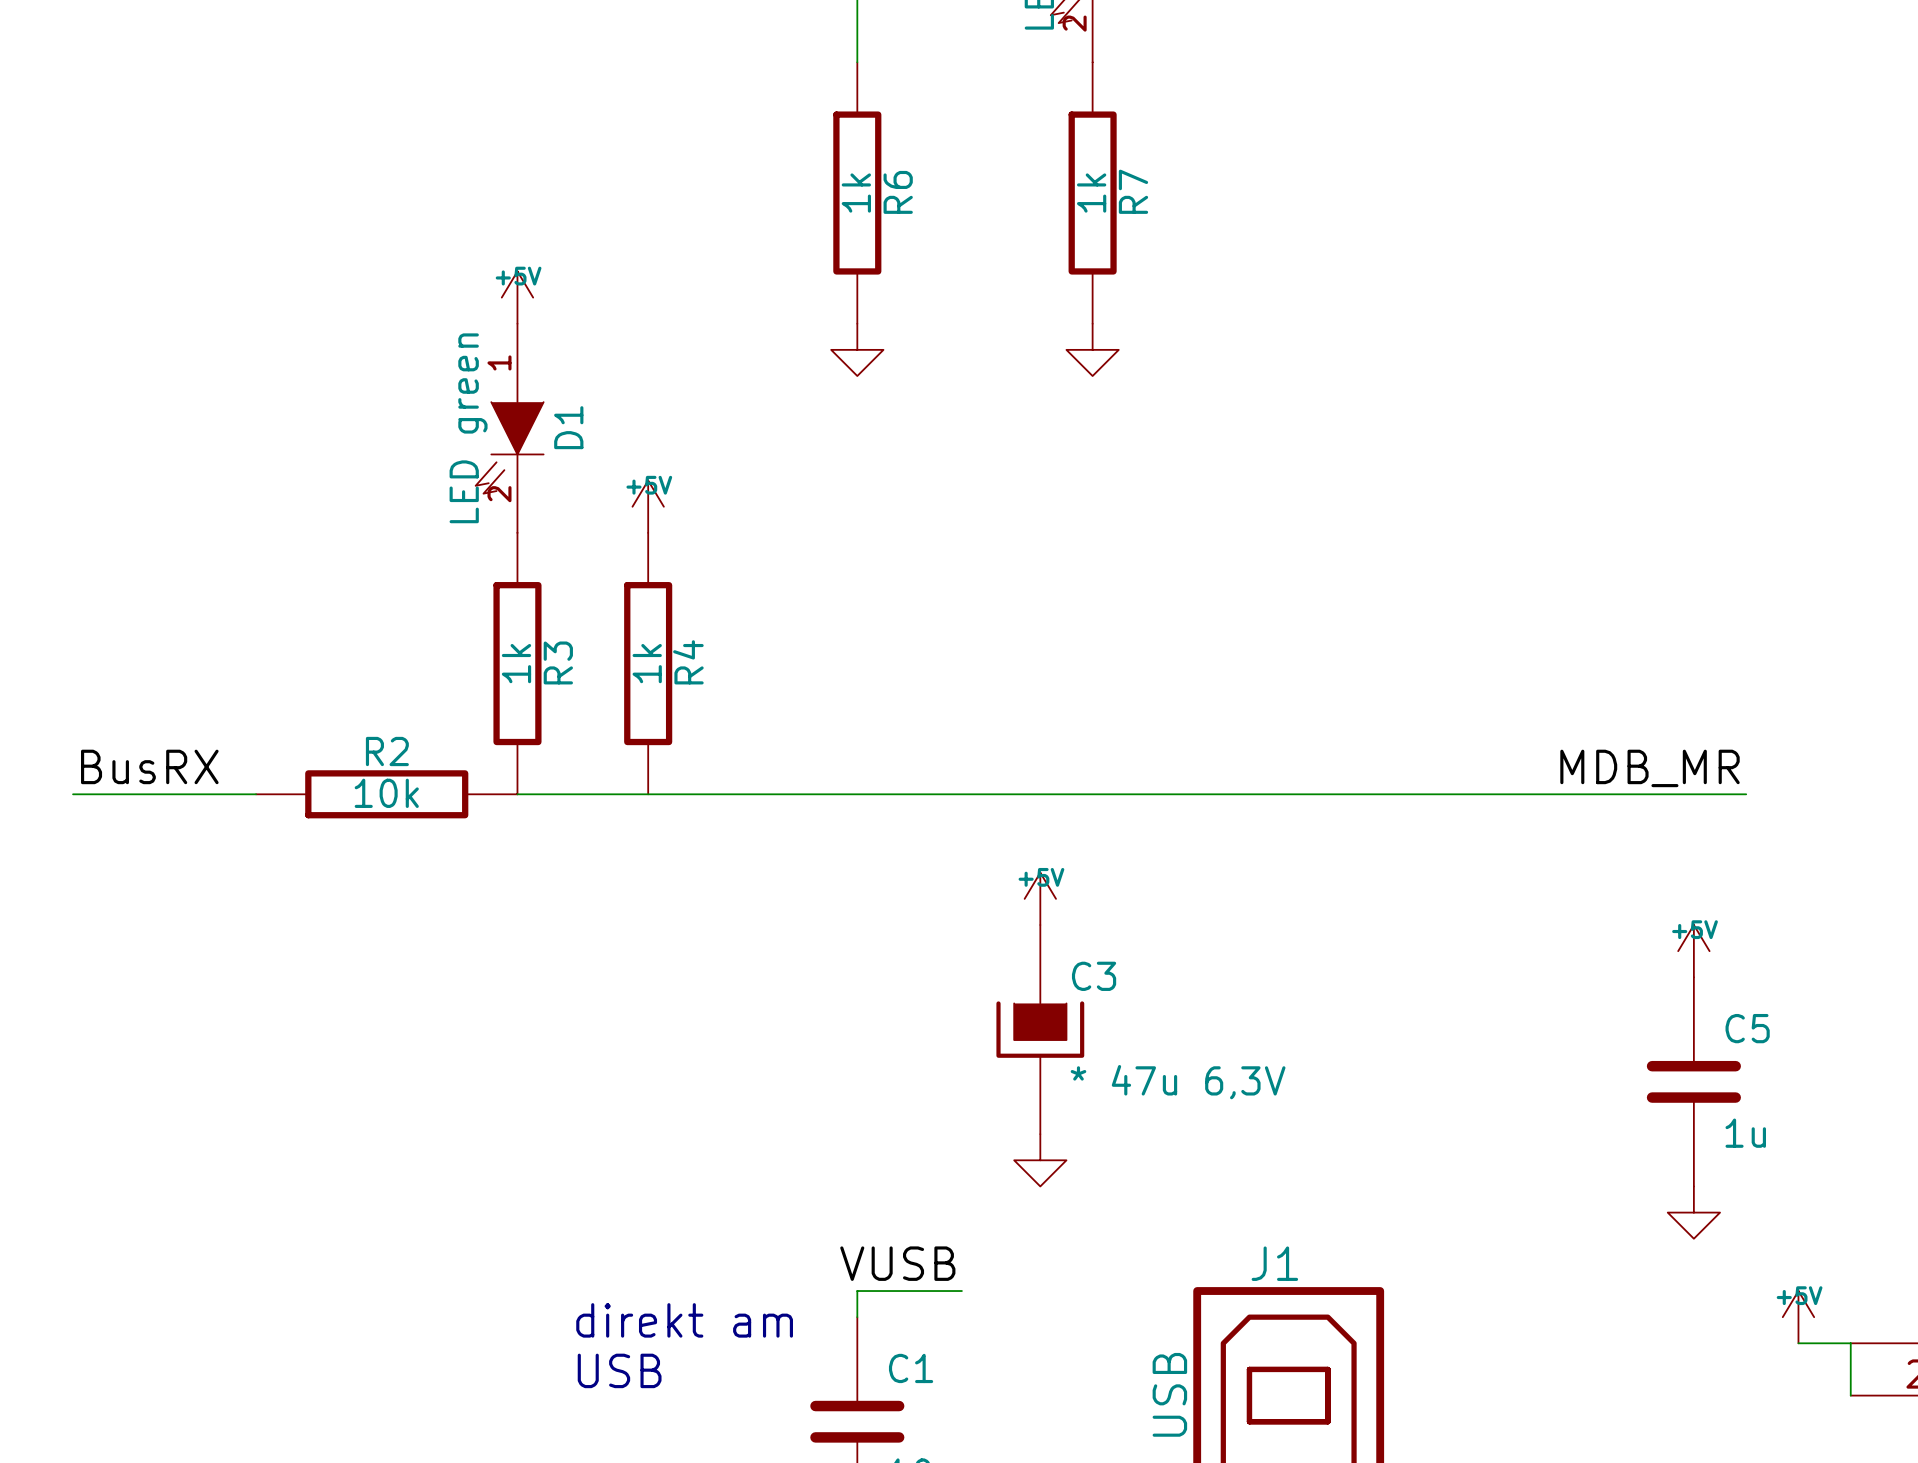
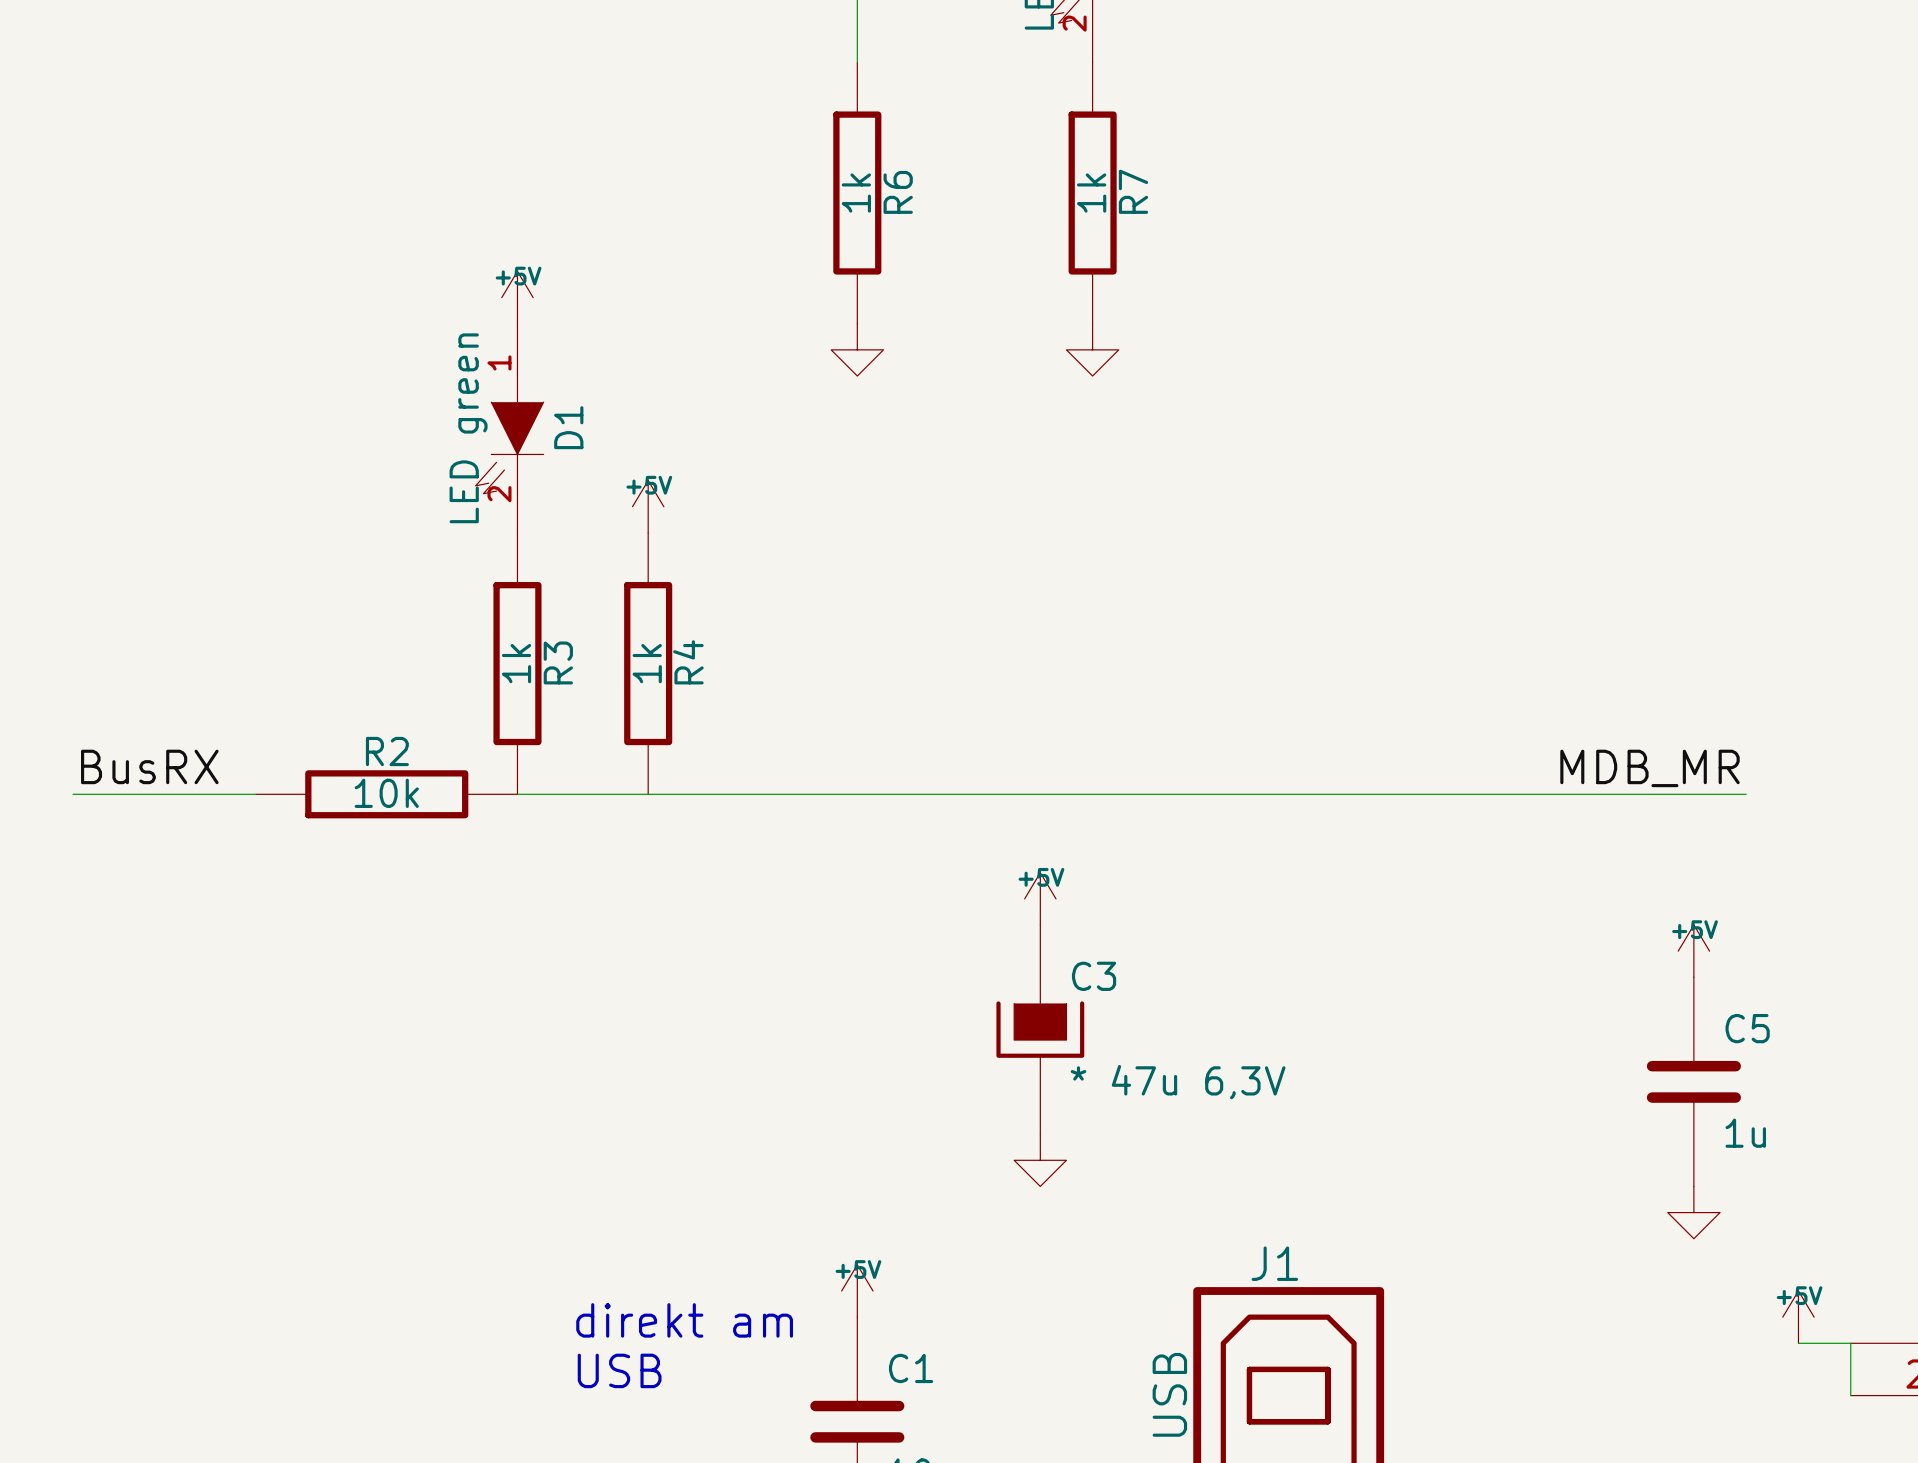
label: VUSB (897, 1263) -> none
power symbol: none -> +5V (857, 1291)
wire: (961, 1291) (857, 1291) (857, 1317) -> none

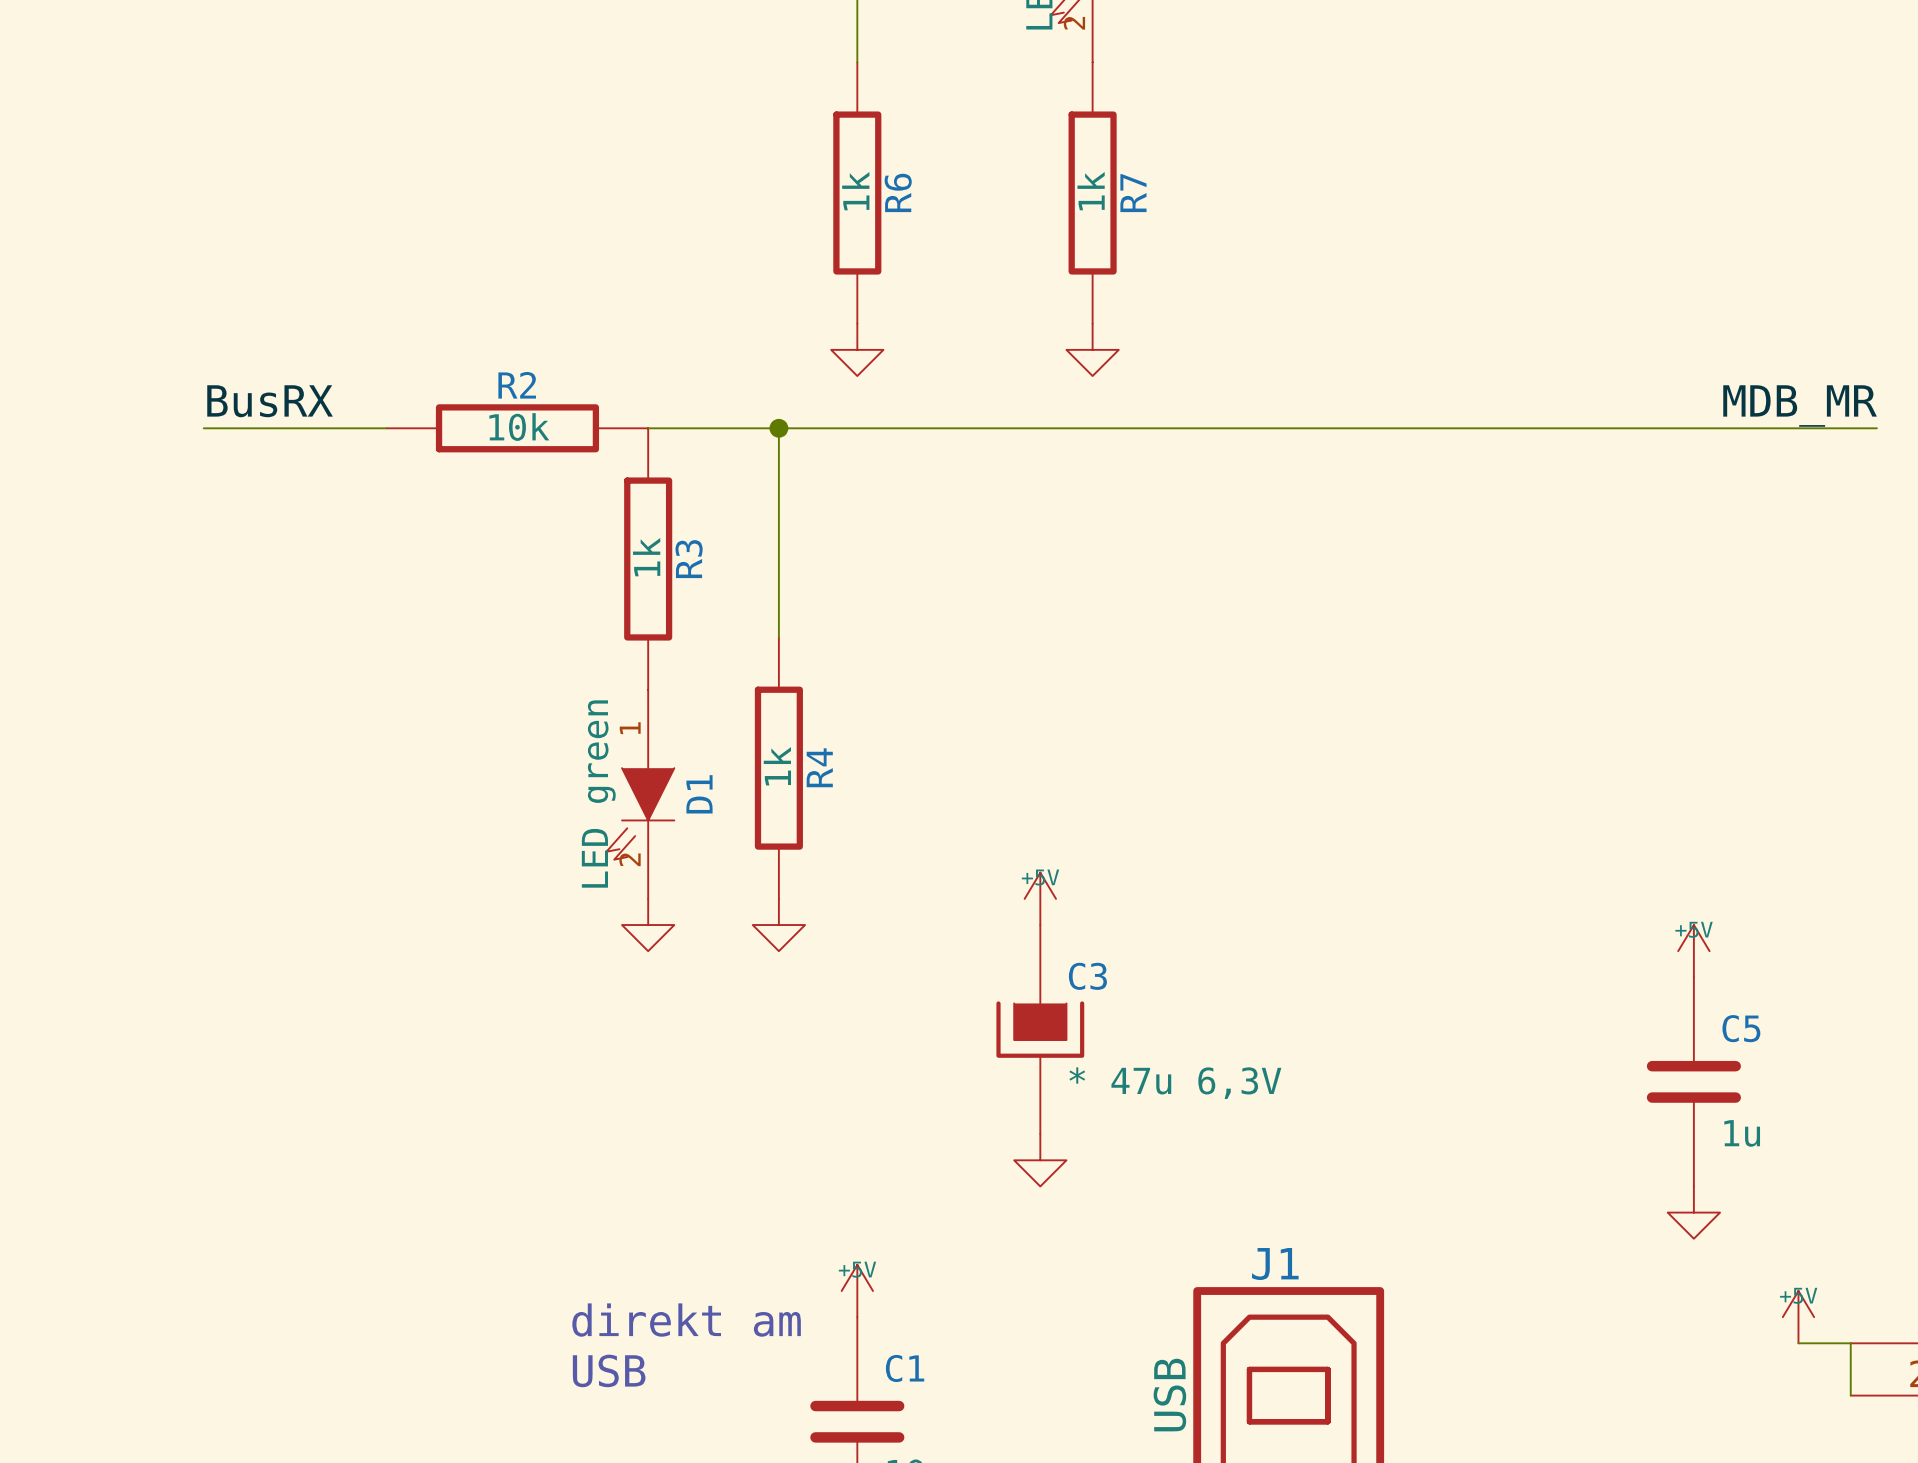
power symbol: +5V (517, 297) -> none
D1 position: (509, 428) -> (640, 794)
wire: none -> (778, 428) (778, 637)
junction: none -> (778, 428)
power symbol: +5V (648, 506) -> none
R3 position: (517, 663) -> (648, 559)
R4 position: (648, 663) -> (778, 768)
label position: BusRX (149, 766) -> BusRX (270, 401)
label position: MDB_MR (1650, 768) -> MDB_MR (1800, 406)
wire: (73, 794) (256, 794) -> (203, 428) (386, 428)
R2 position: (386, 794) -> (517, 428)
wire: (517, 794) (1746, 794) -> (648, 428) (1876, 428)
power symbol: none -> (648, 925)
power symbol: none -> (778, 925)

